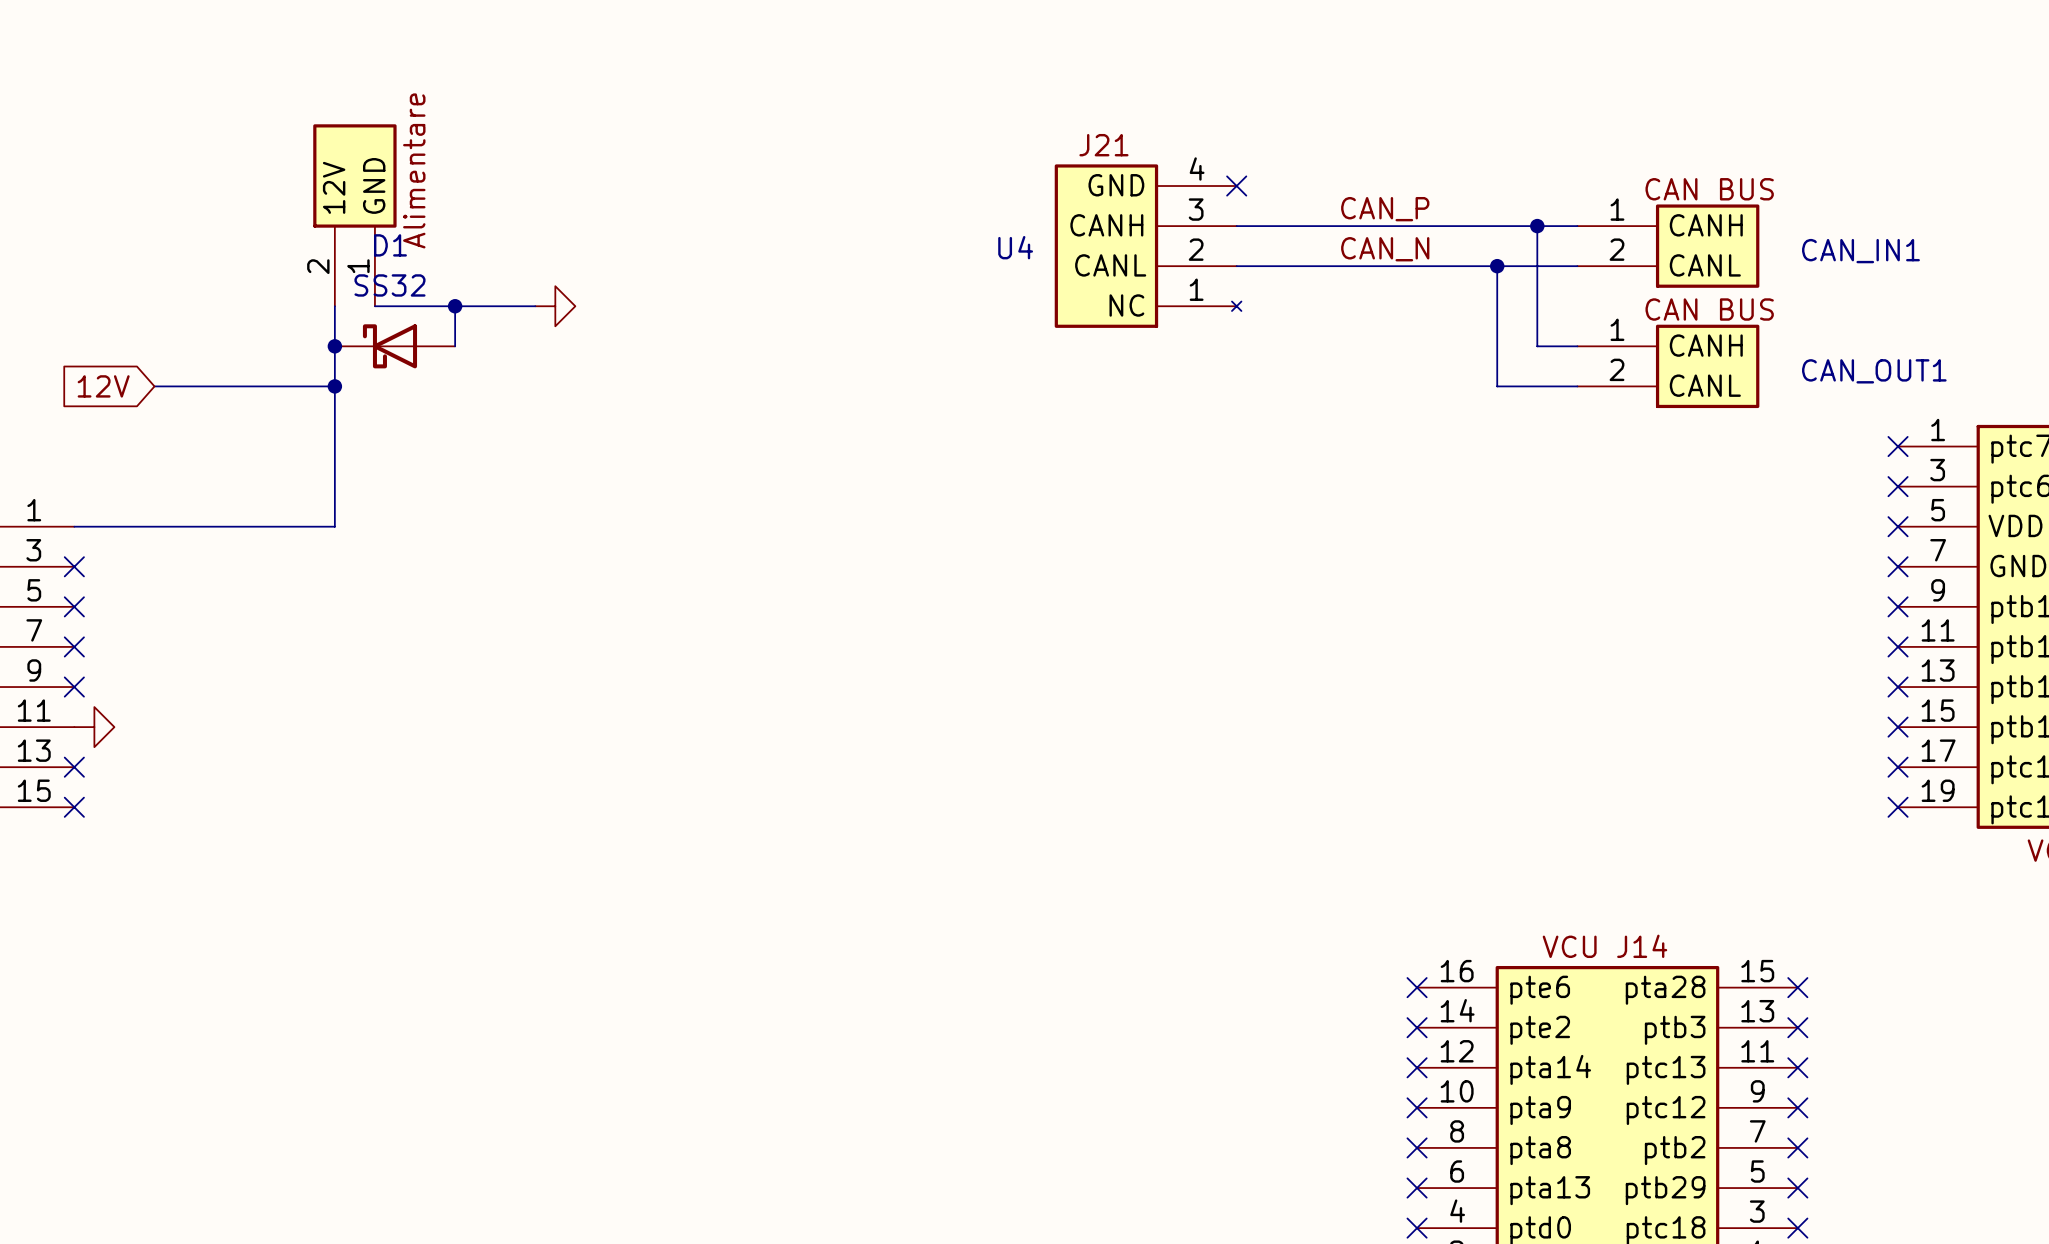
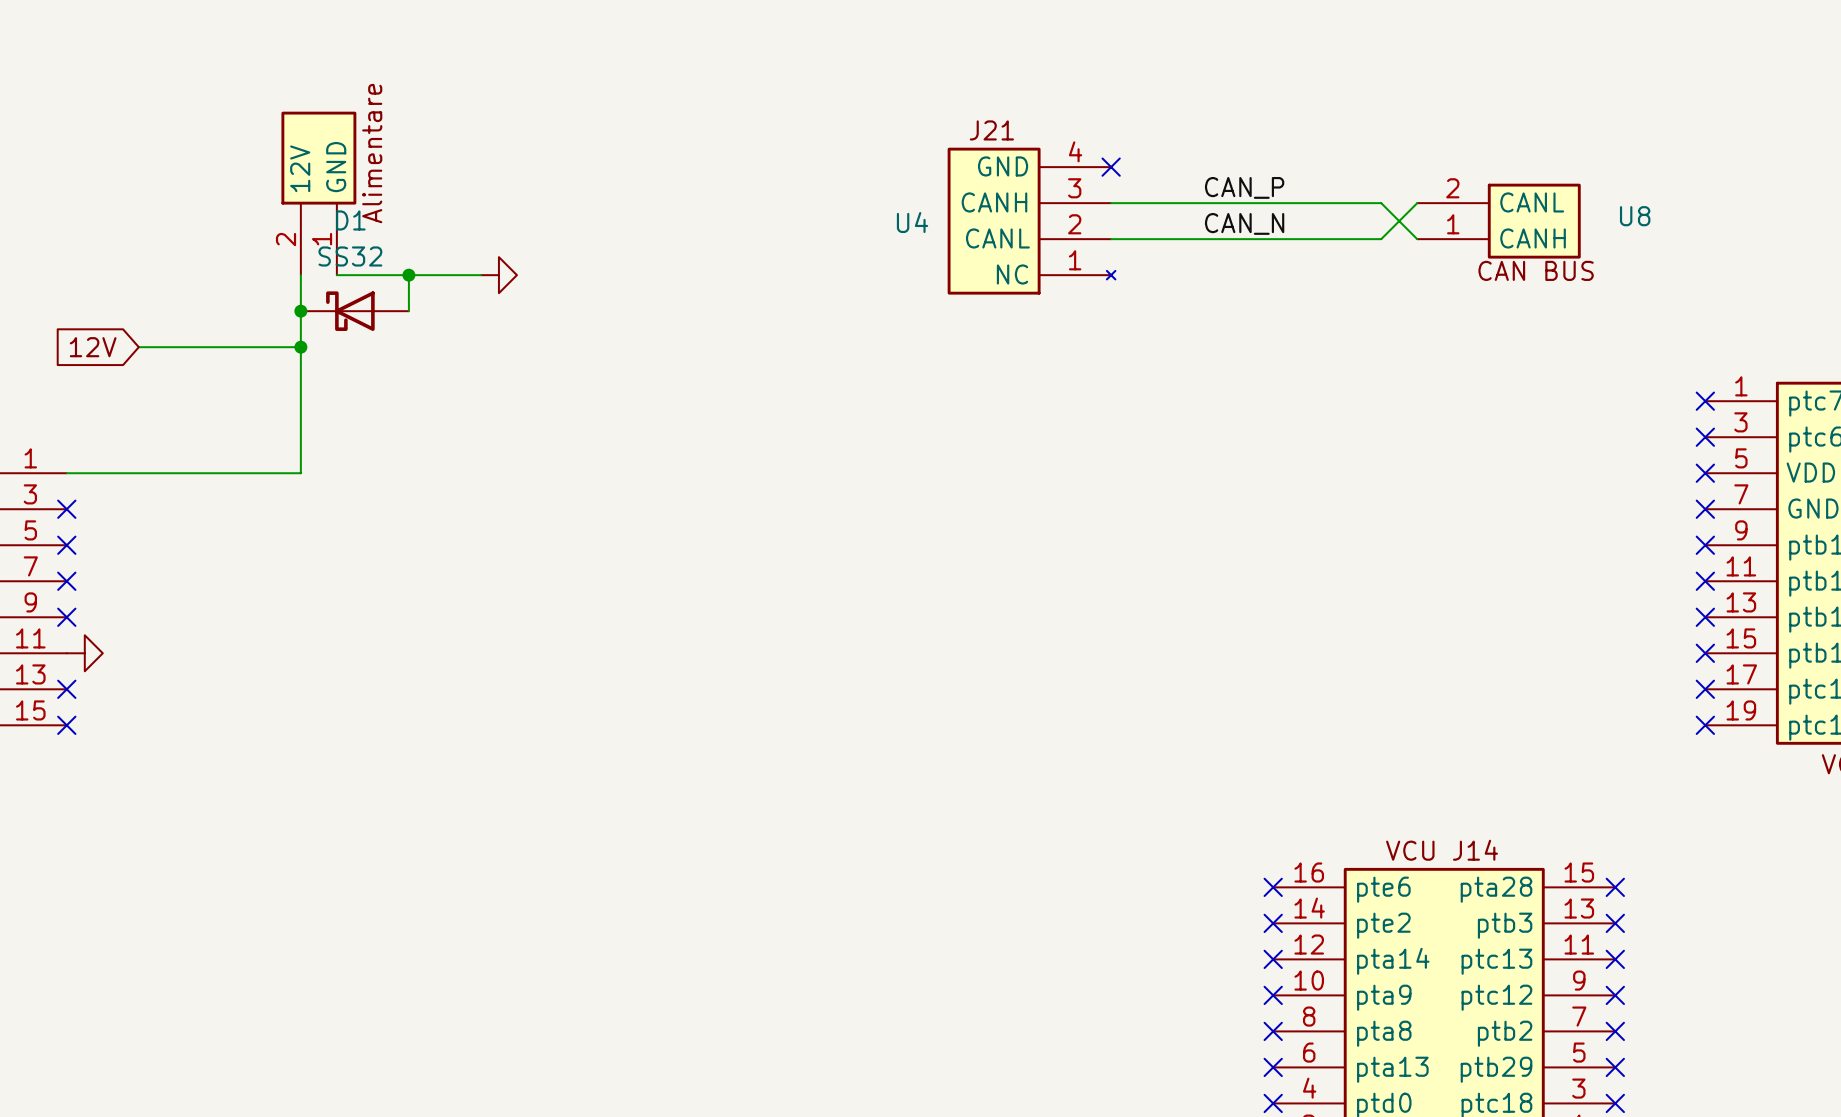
junction: (1537, 226) -> none
wire: (1577, 226) (1537, 226) (1537, 346) (1577, 346) -> (1417, 203) (1381, 239)
CAN_IN1 flip: as is (1707, 246) -> up-down (1534, 221)
CAN_IN1 name: CAN_IN1 (1860, 251) -> U8 (1635, 216)
wire: (1497, 266) (1497, 386) (1577, 386) -> none
junction: (1497, 266) -> none
wire: (1537, 266) (1577, 266) -> (1381, 203) (1417, 239)
CAN_OUT1: (1668, 366) -> none

